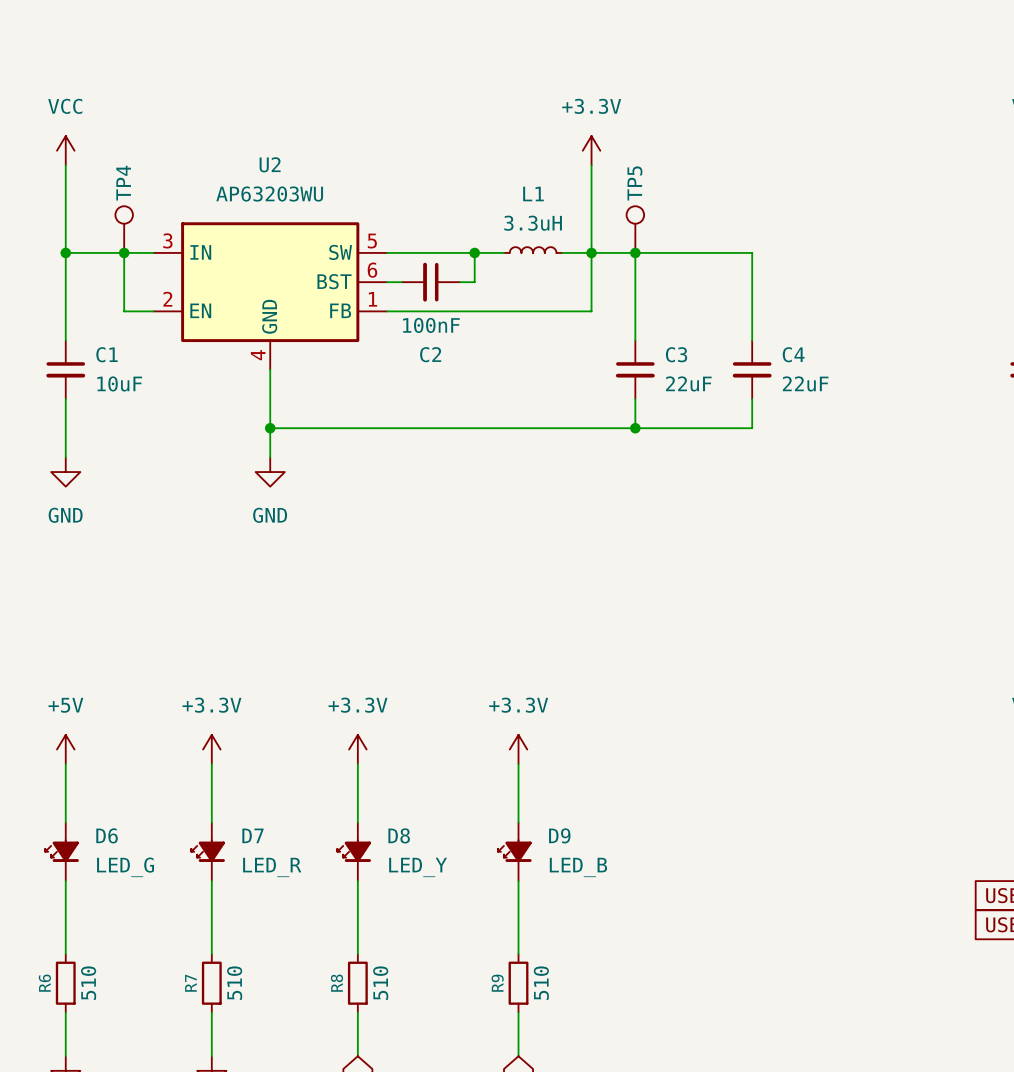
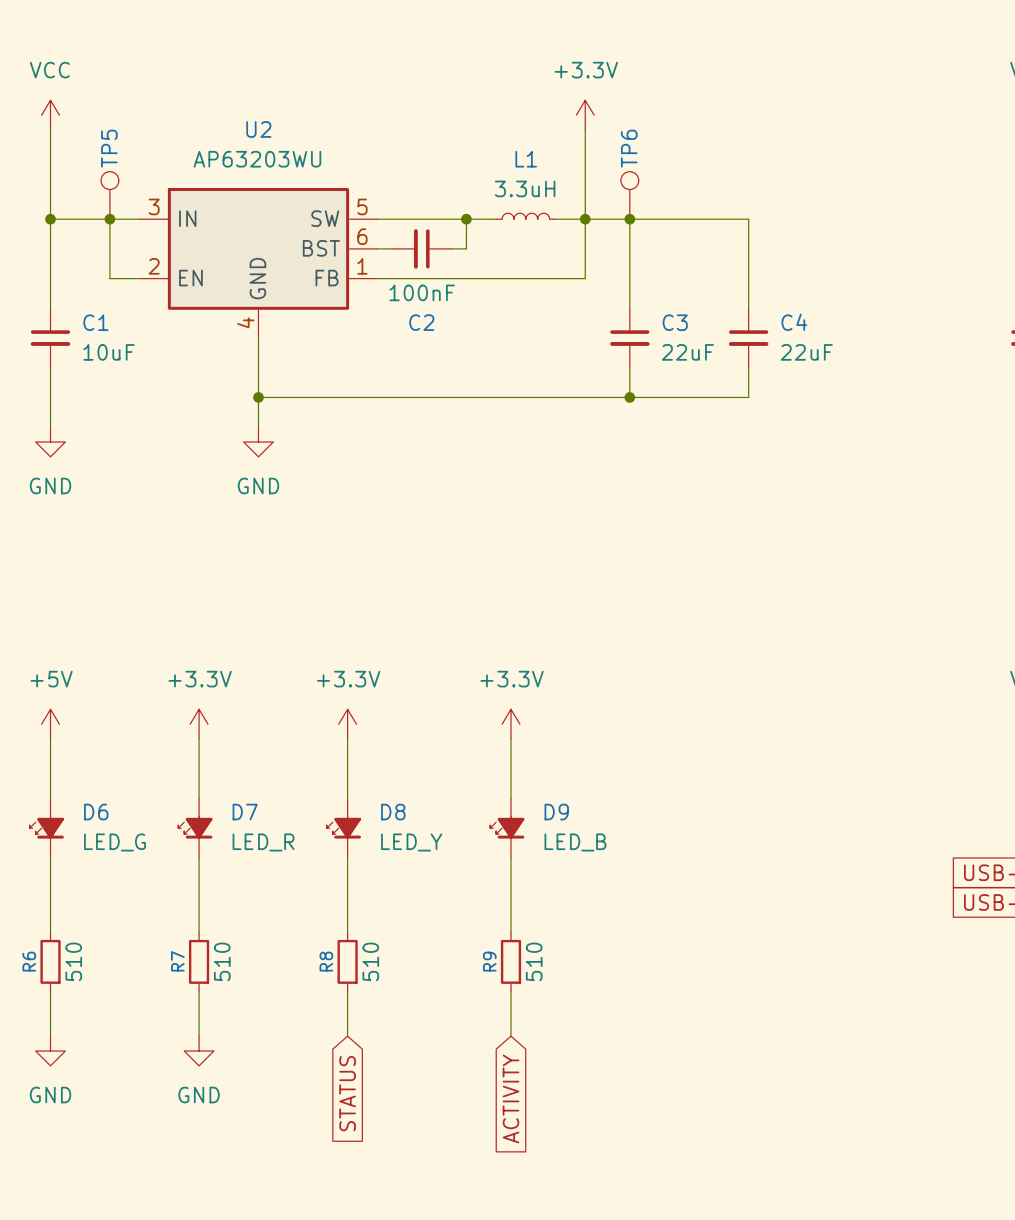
TP4 name: TP4 (123, 183) -> TP5 (109, 148)
TP5 name: TP5 (634, 183) -> TP6 (629, 148)

